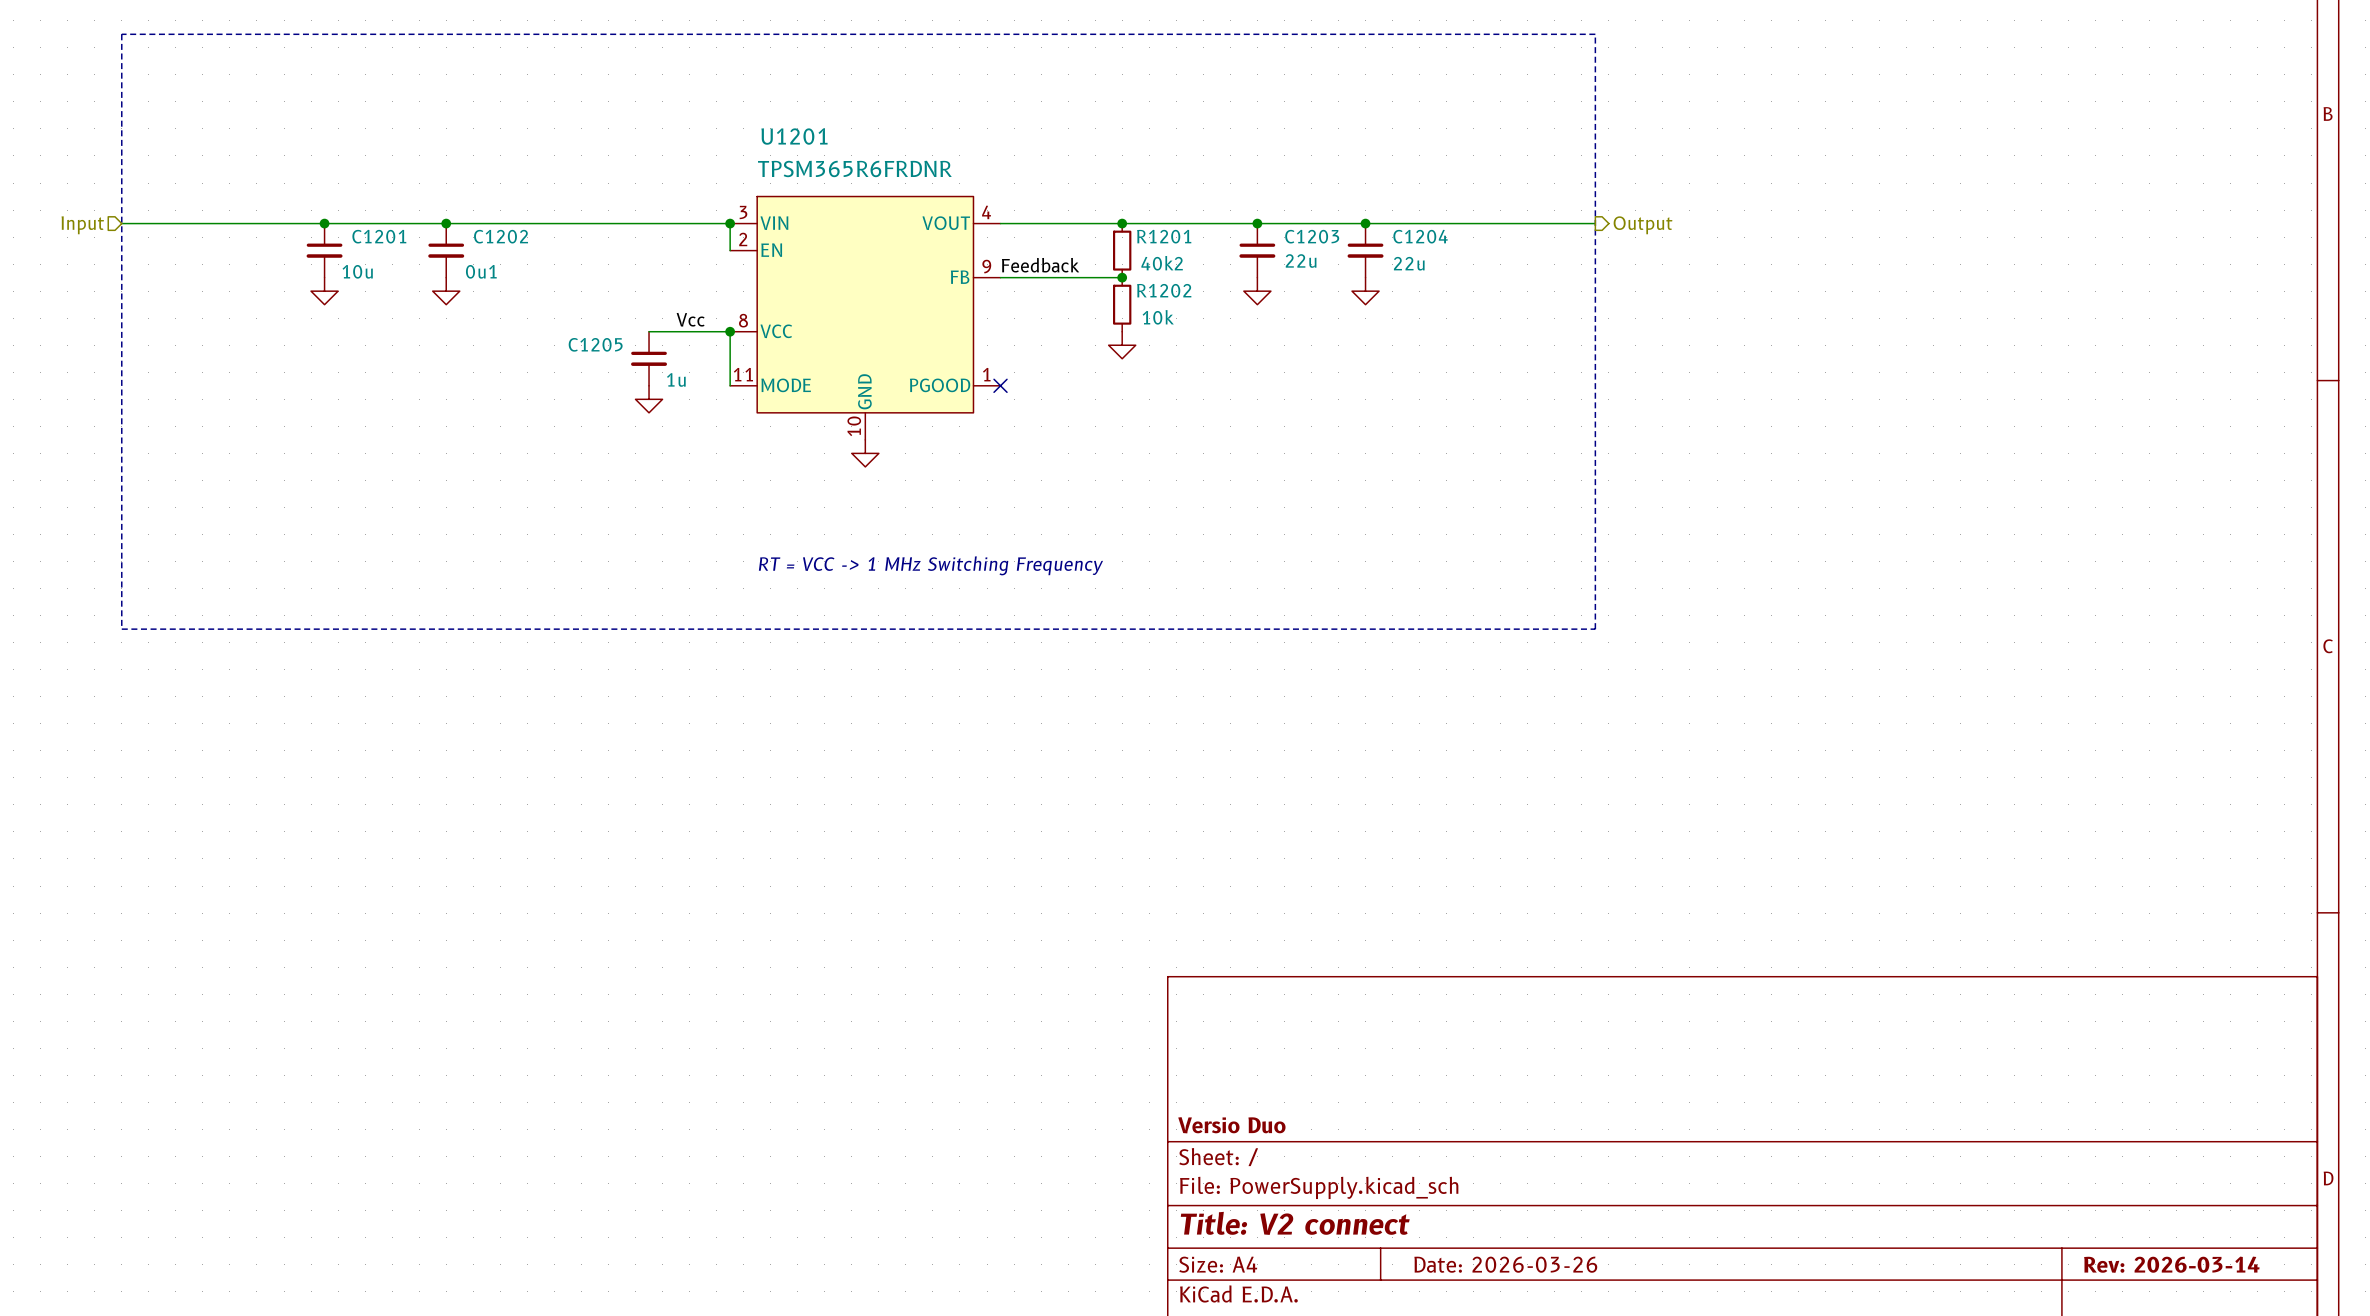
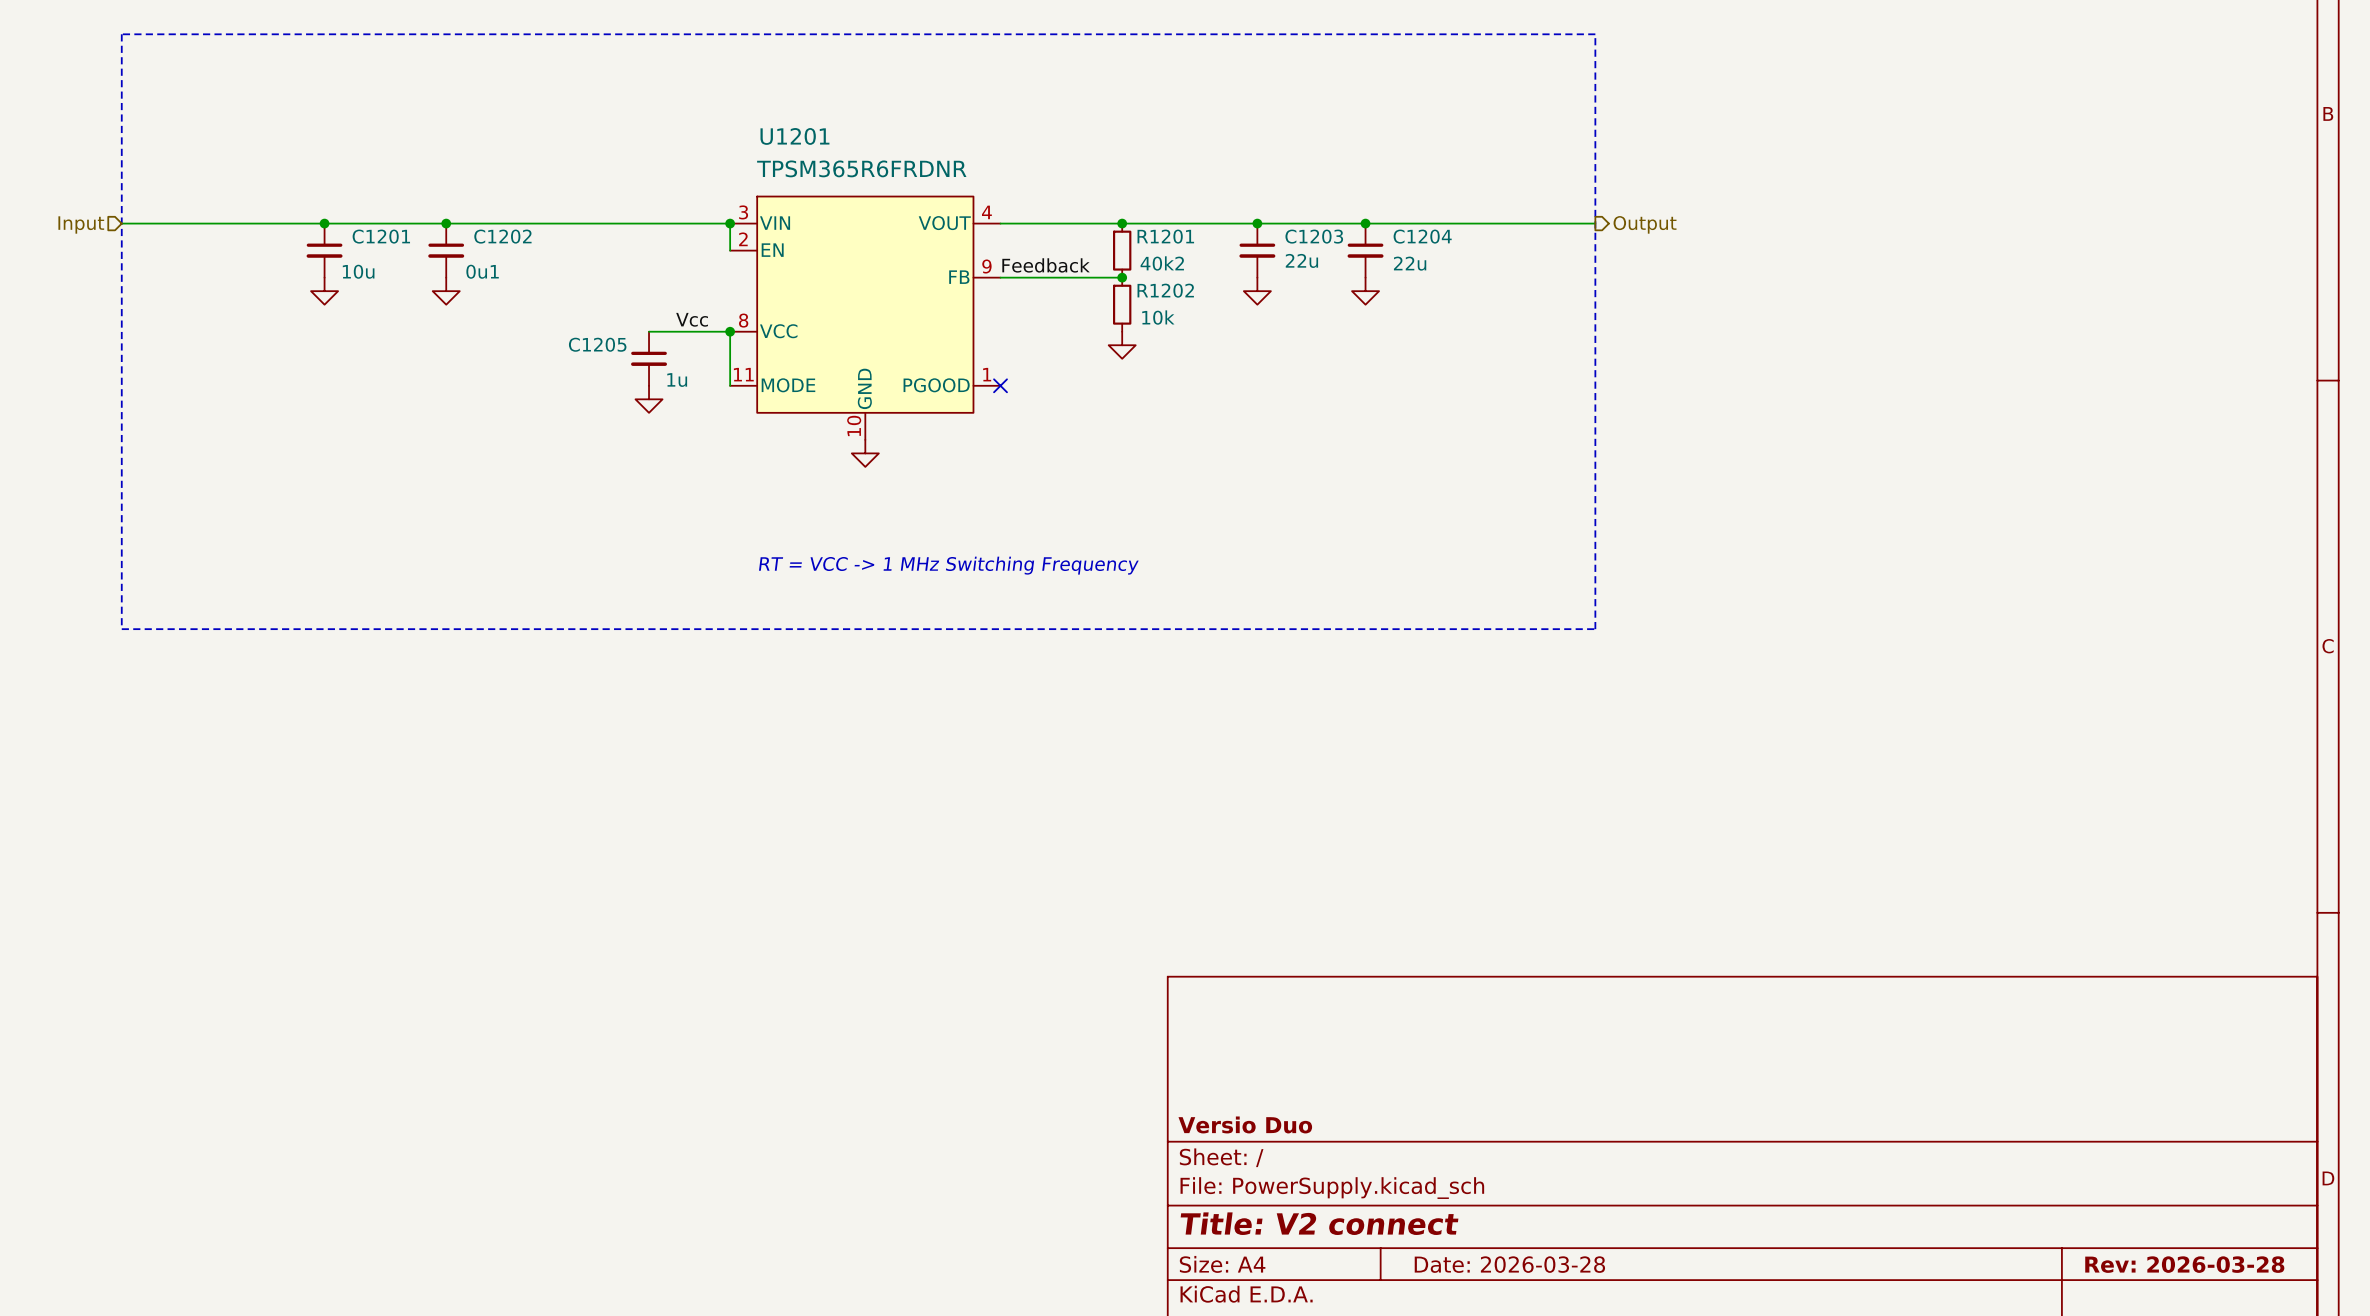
title block: Date: 2026-03-26 (1505, 1264) -> Date: 2026-03-28 (1509, 1264)
title block: Rev: 2026-03-14 (2171, 1264) -> Rev: 2026-03-28 (2184, 1264)

